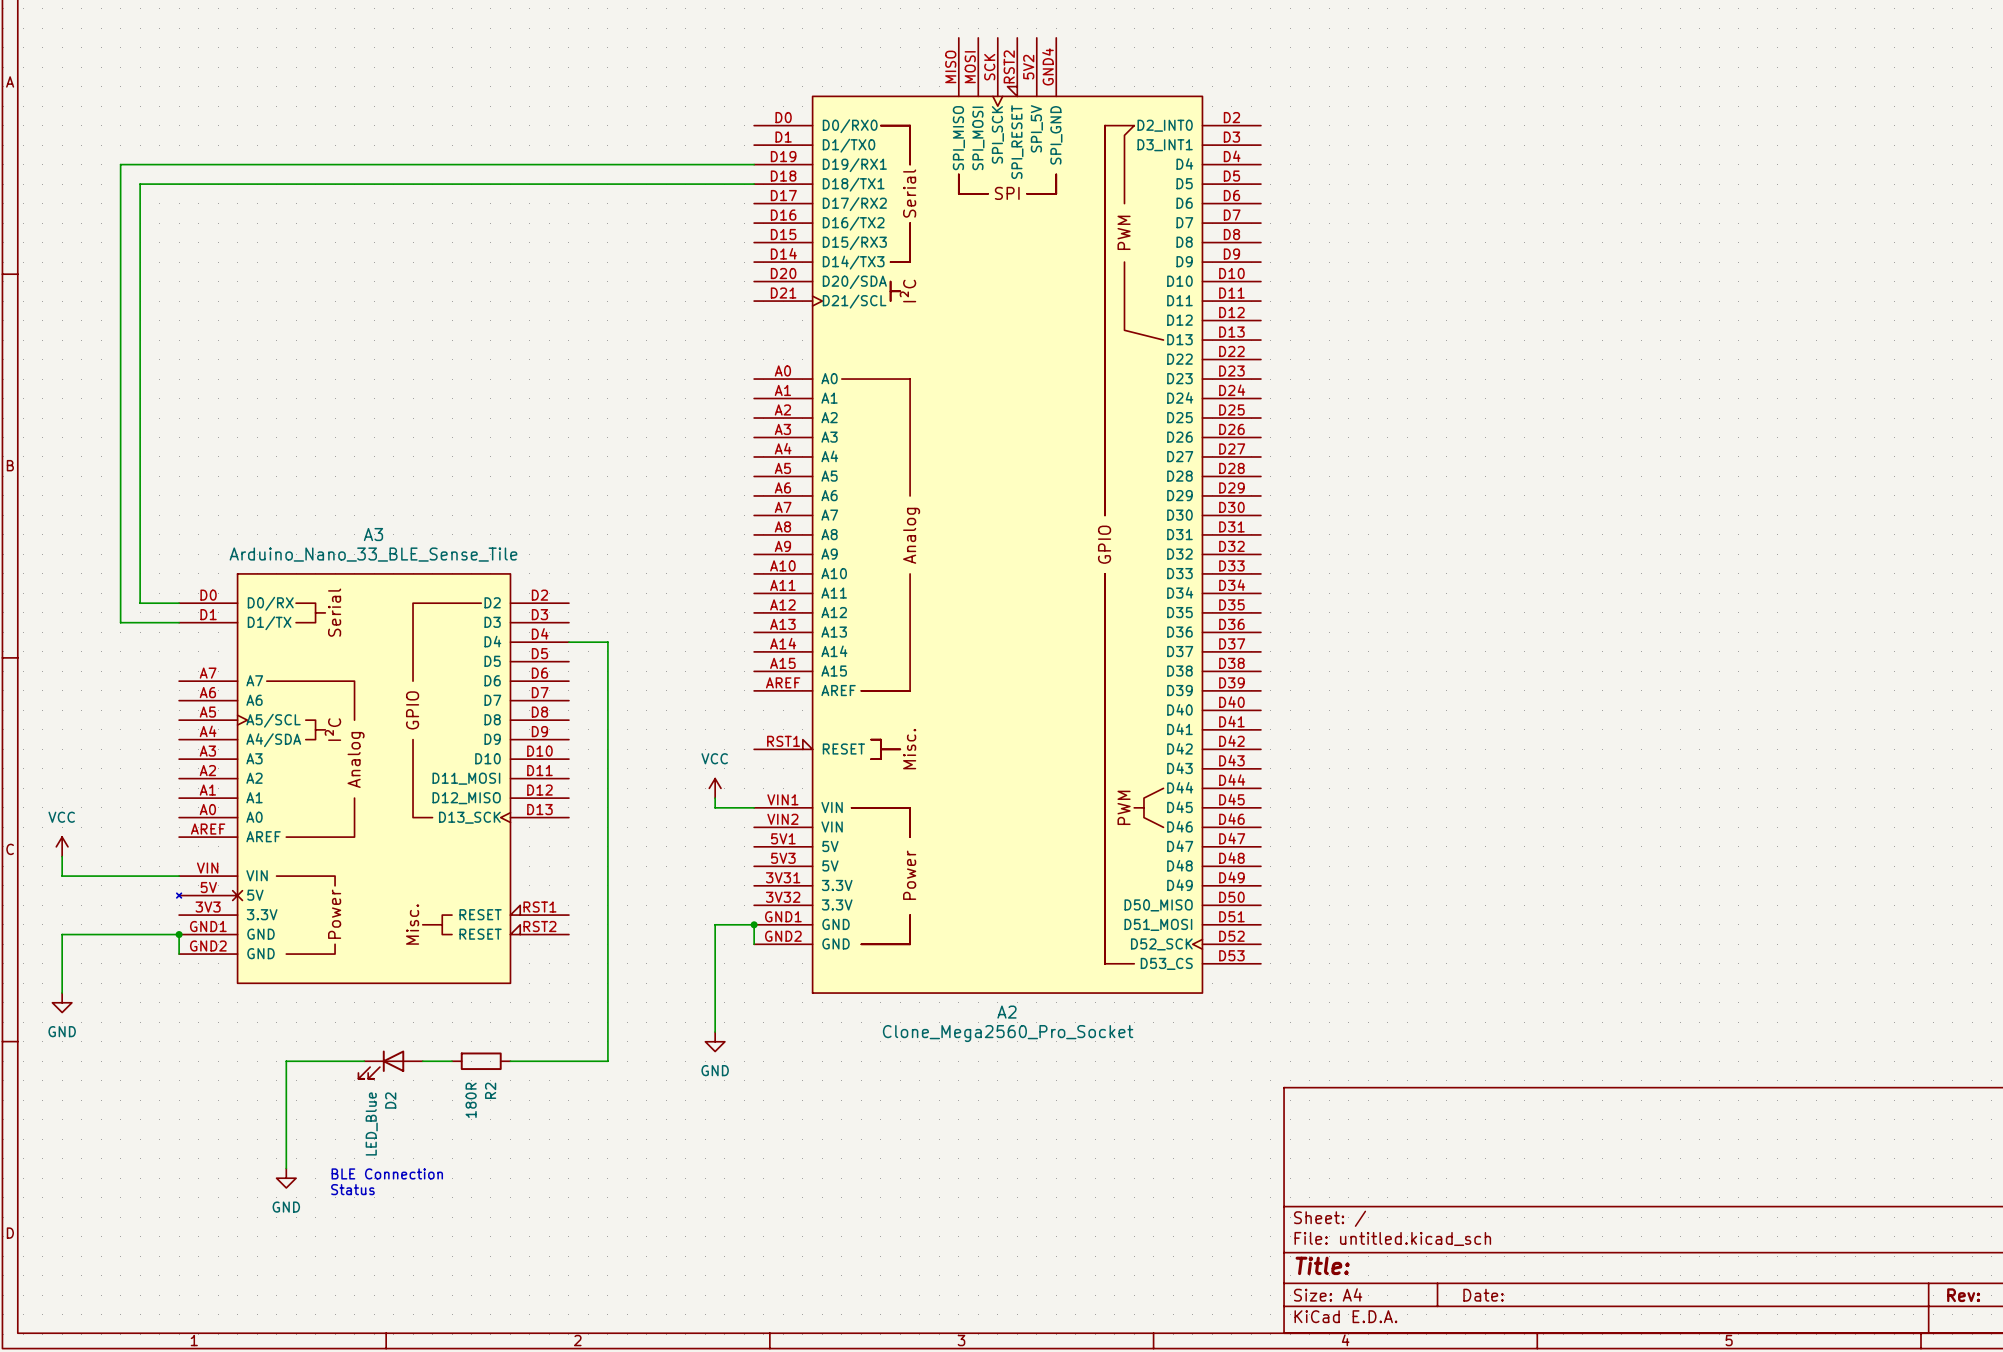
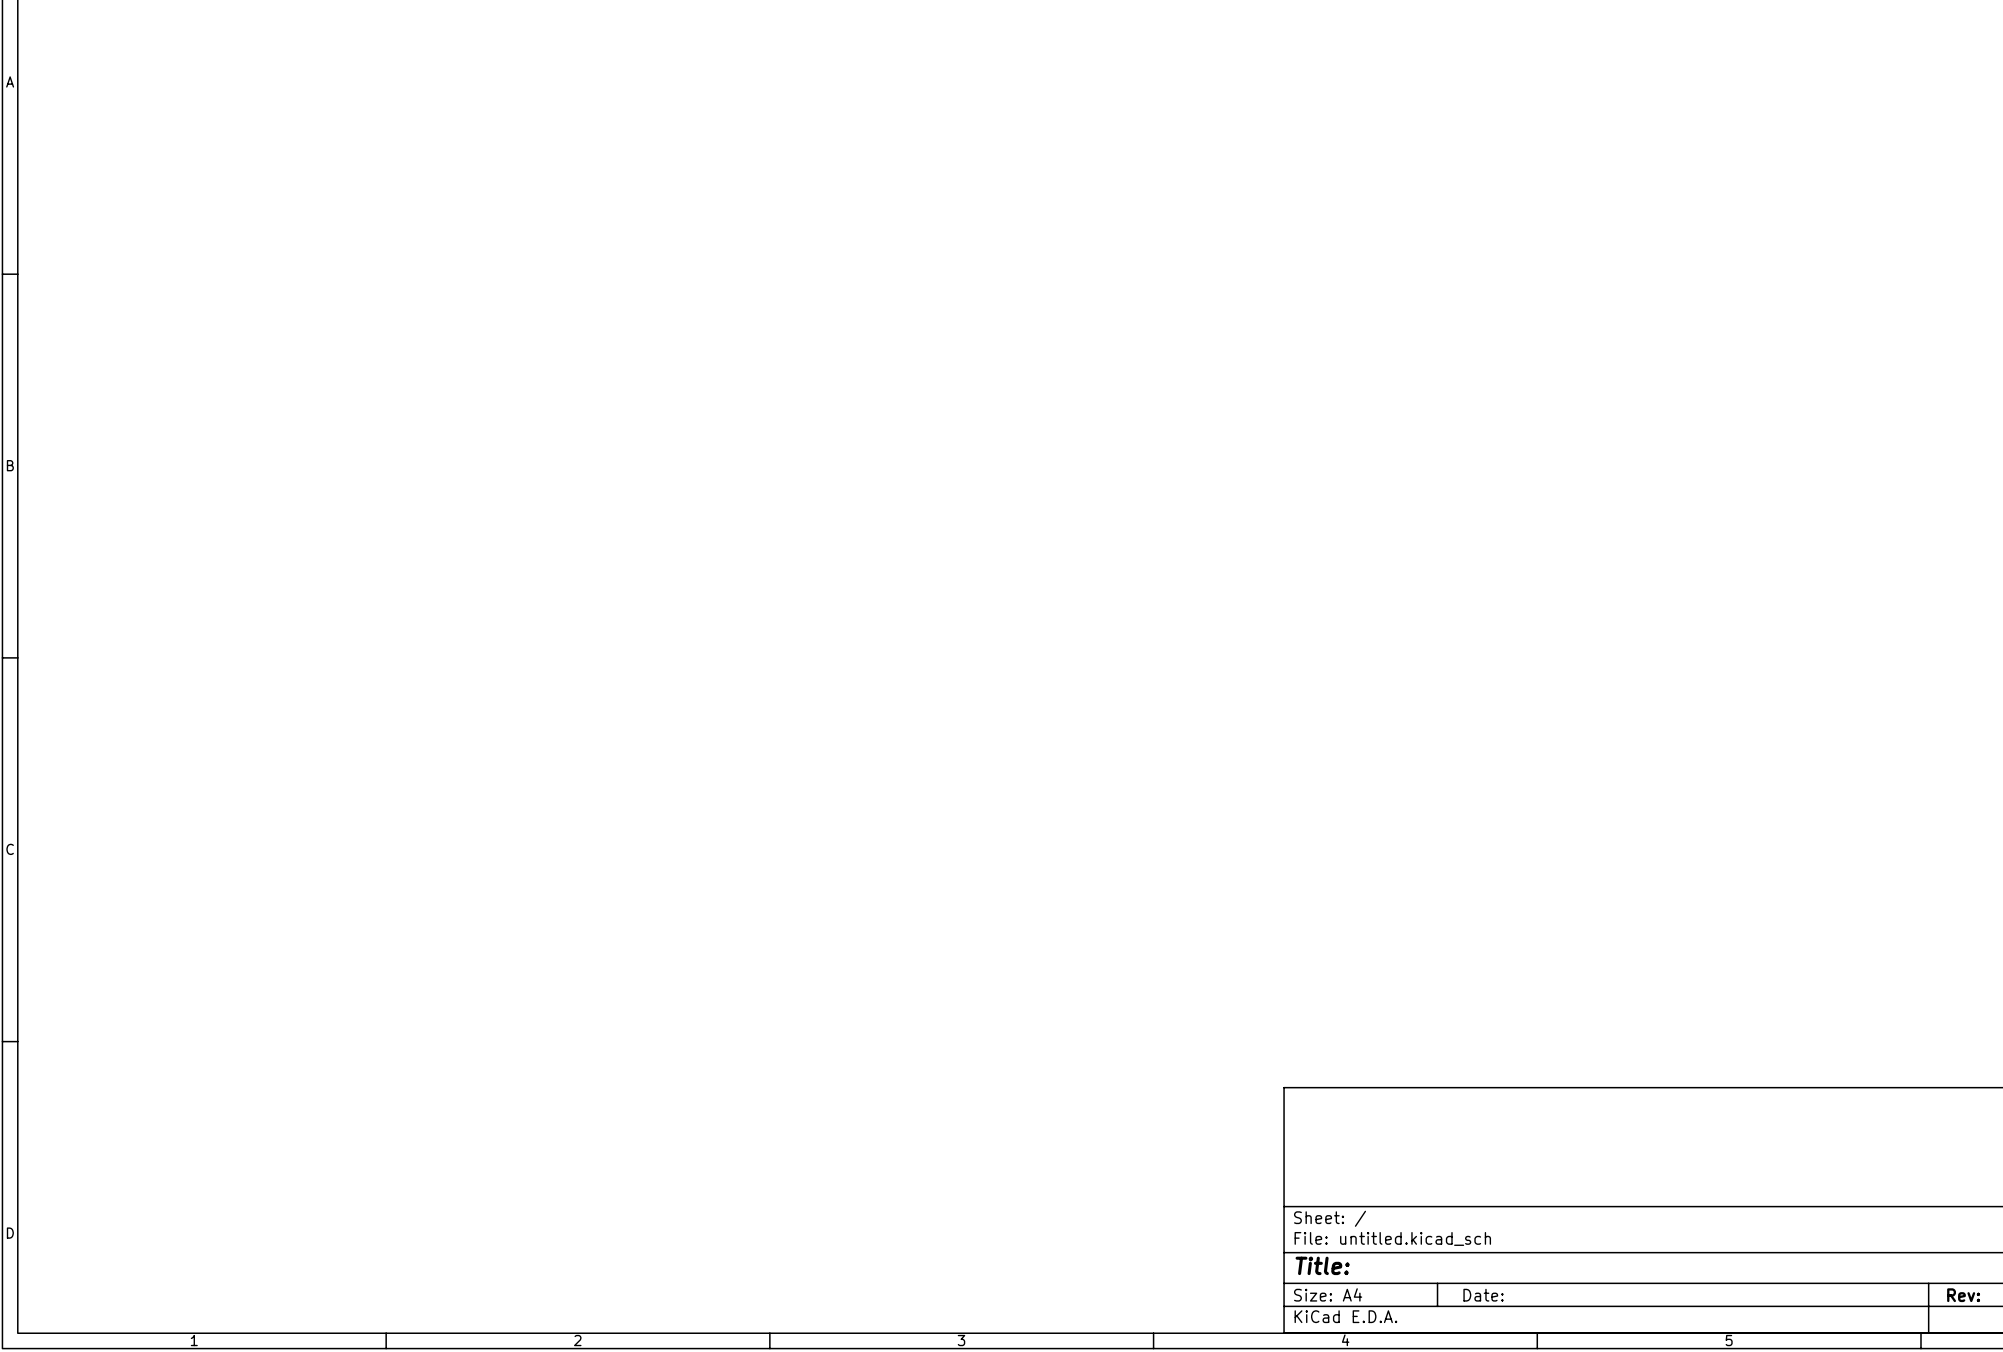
wire: (754, 164) (120, 164) (120, 622) (179, 622) -> none
wire: (754, 184) (140, 184) (140, 603) (179, 603) -> none
A2: Clone_Mega2560_Pro_Socket (1007, 515) -> none
wire: (568, 642) (607, 642) (607, 1061) (510, 1061) -> none
A3: Arduino_Nano_33_BLE_Sense_Tile (372, 778) -> none
power symbol: VCC (715, 788) -> none
wire: (715, 798) (715, 807) (754, 807) -> none
power symbol: VCC (62, 846) -> none
wire: (62, 856) (62, 876) (179, 876) -> none
junction: (754, 924) -> none
junction: (179, 934) -> none
wire: (754, 944) (754, 924) (715, 924) (715, 1032) -> none
wire: (179, 954) (179, 934) (62, 934) (62, 993) -> none
power symbol: GND (62, 1002) -> none
power symbol: GND (715, 1041) -> none
wire: (364, 1061) (286, 1061) (286, 1168) -> none
wire: (422, 1061) (452, 1061) -> none
R2: 180R (481, 1061) -> none
D2: LED_Blue (390, 1064) -> none
text: BLE Connection (387, 1173) -> none
power symbol: GND (286, 1178) -> none
text: Status (352, 1189) -> none

